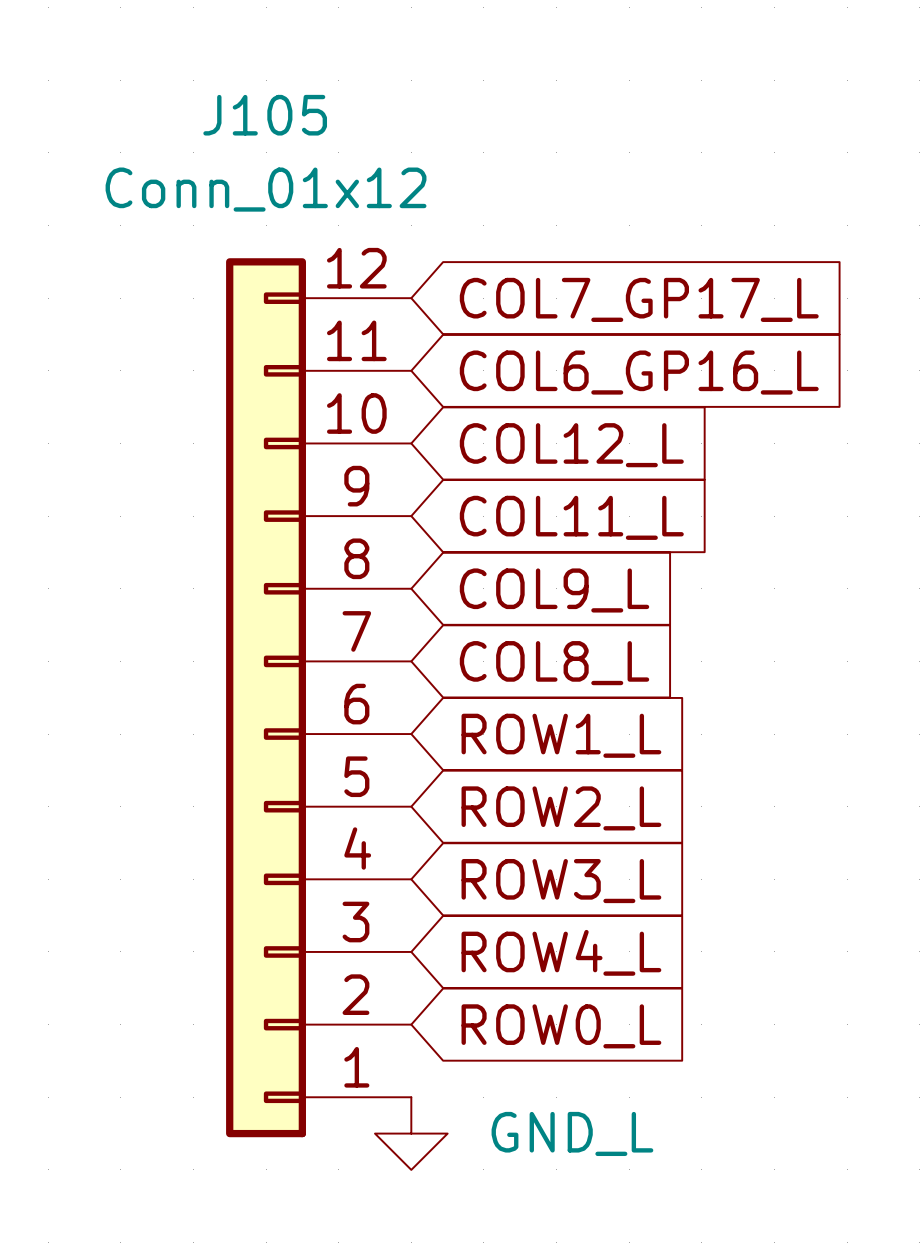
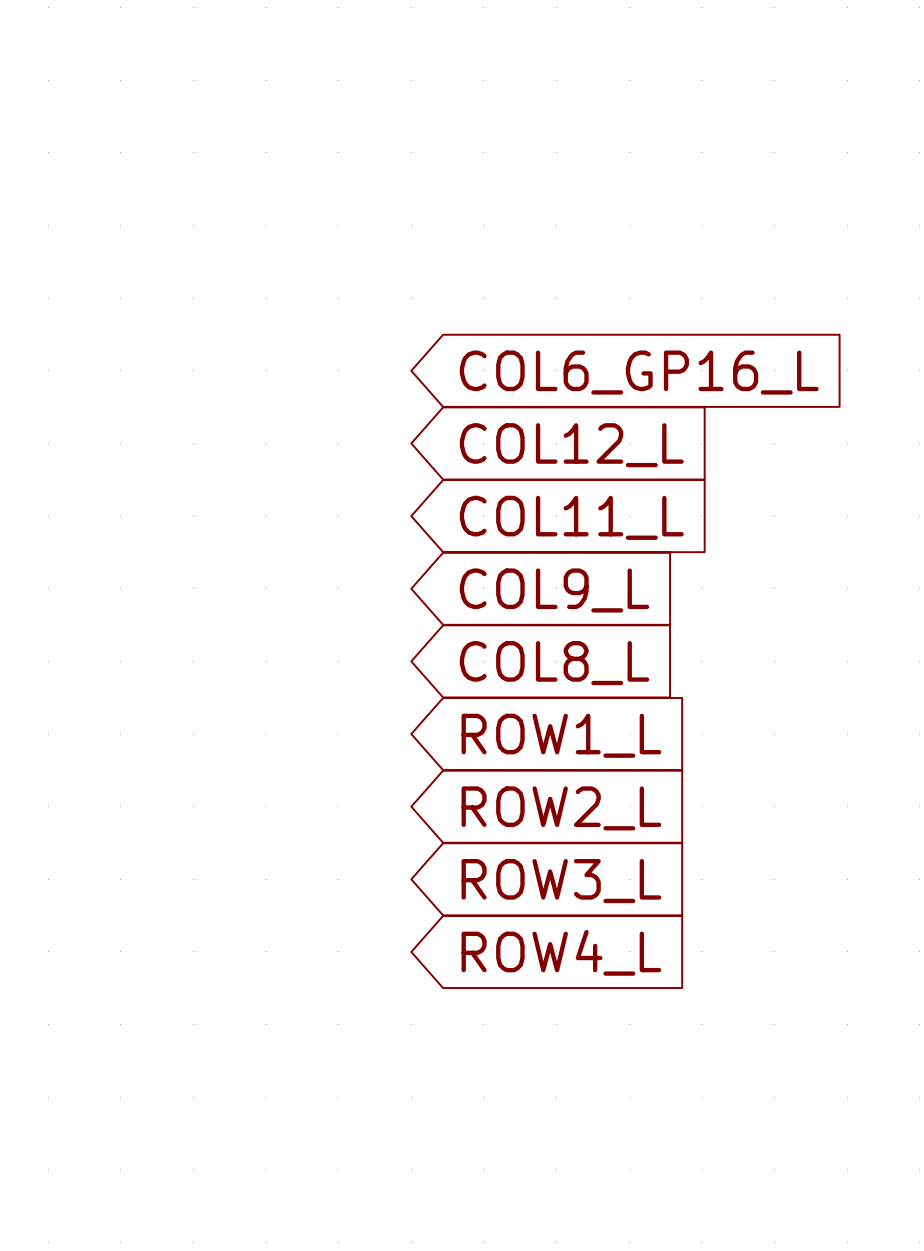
global label: COL7_GP17_L (639, 299) -> none
J105: Conn_01x12 (318, 697) -> none
global label: ROW0_L (561, 1026) -> none
power symbol: GND_L (411, 1133) -> none

